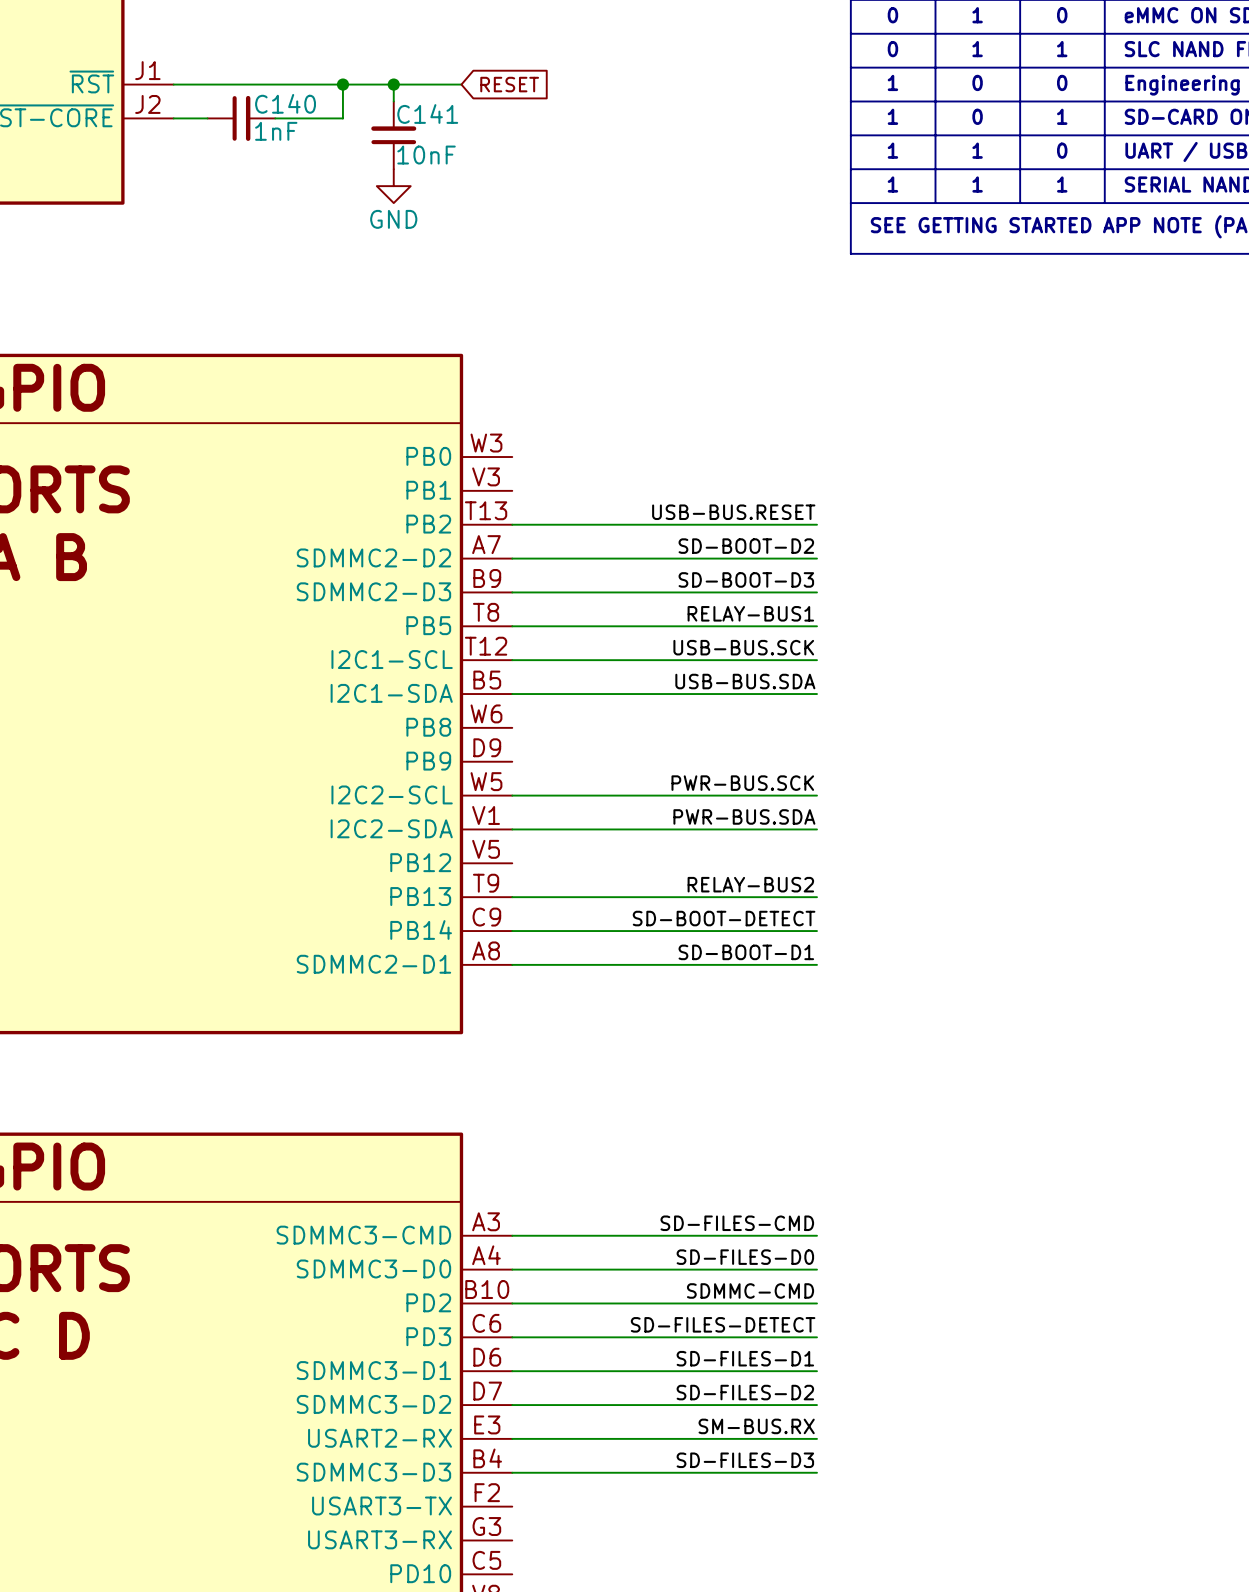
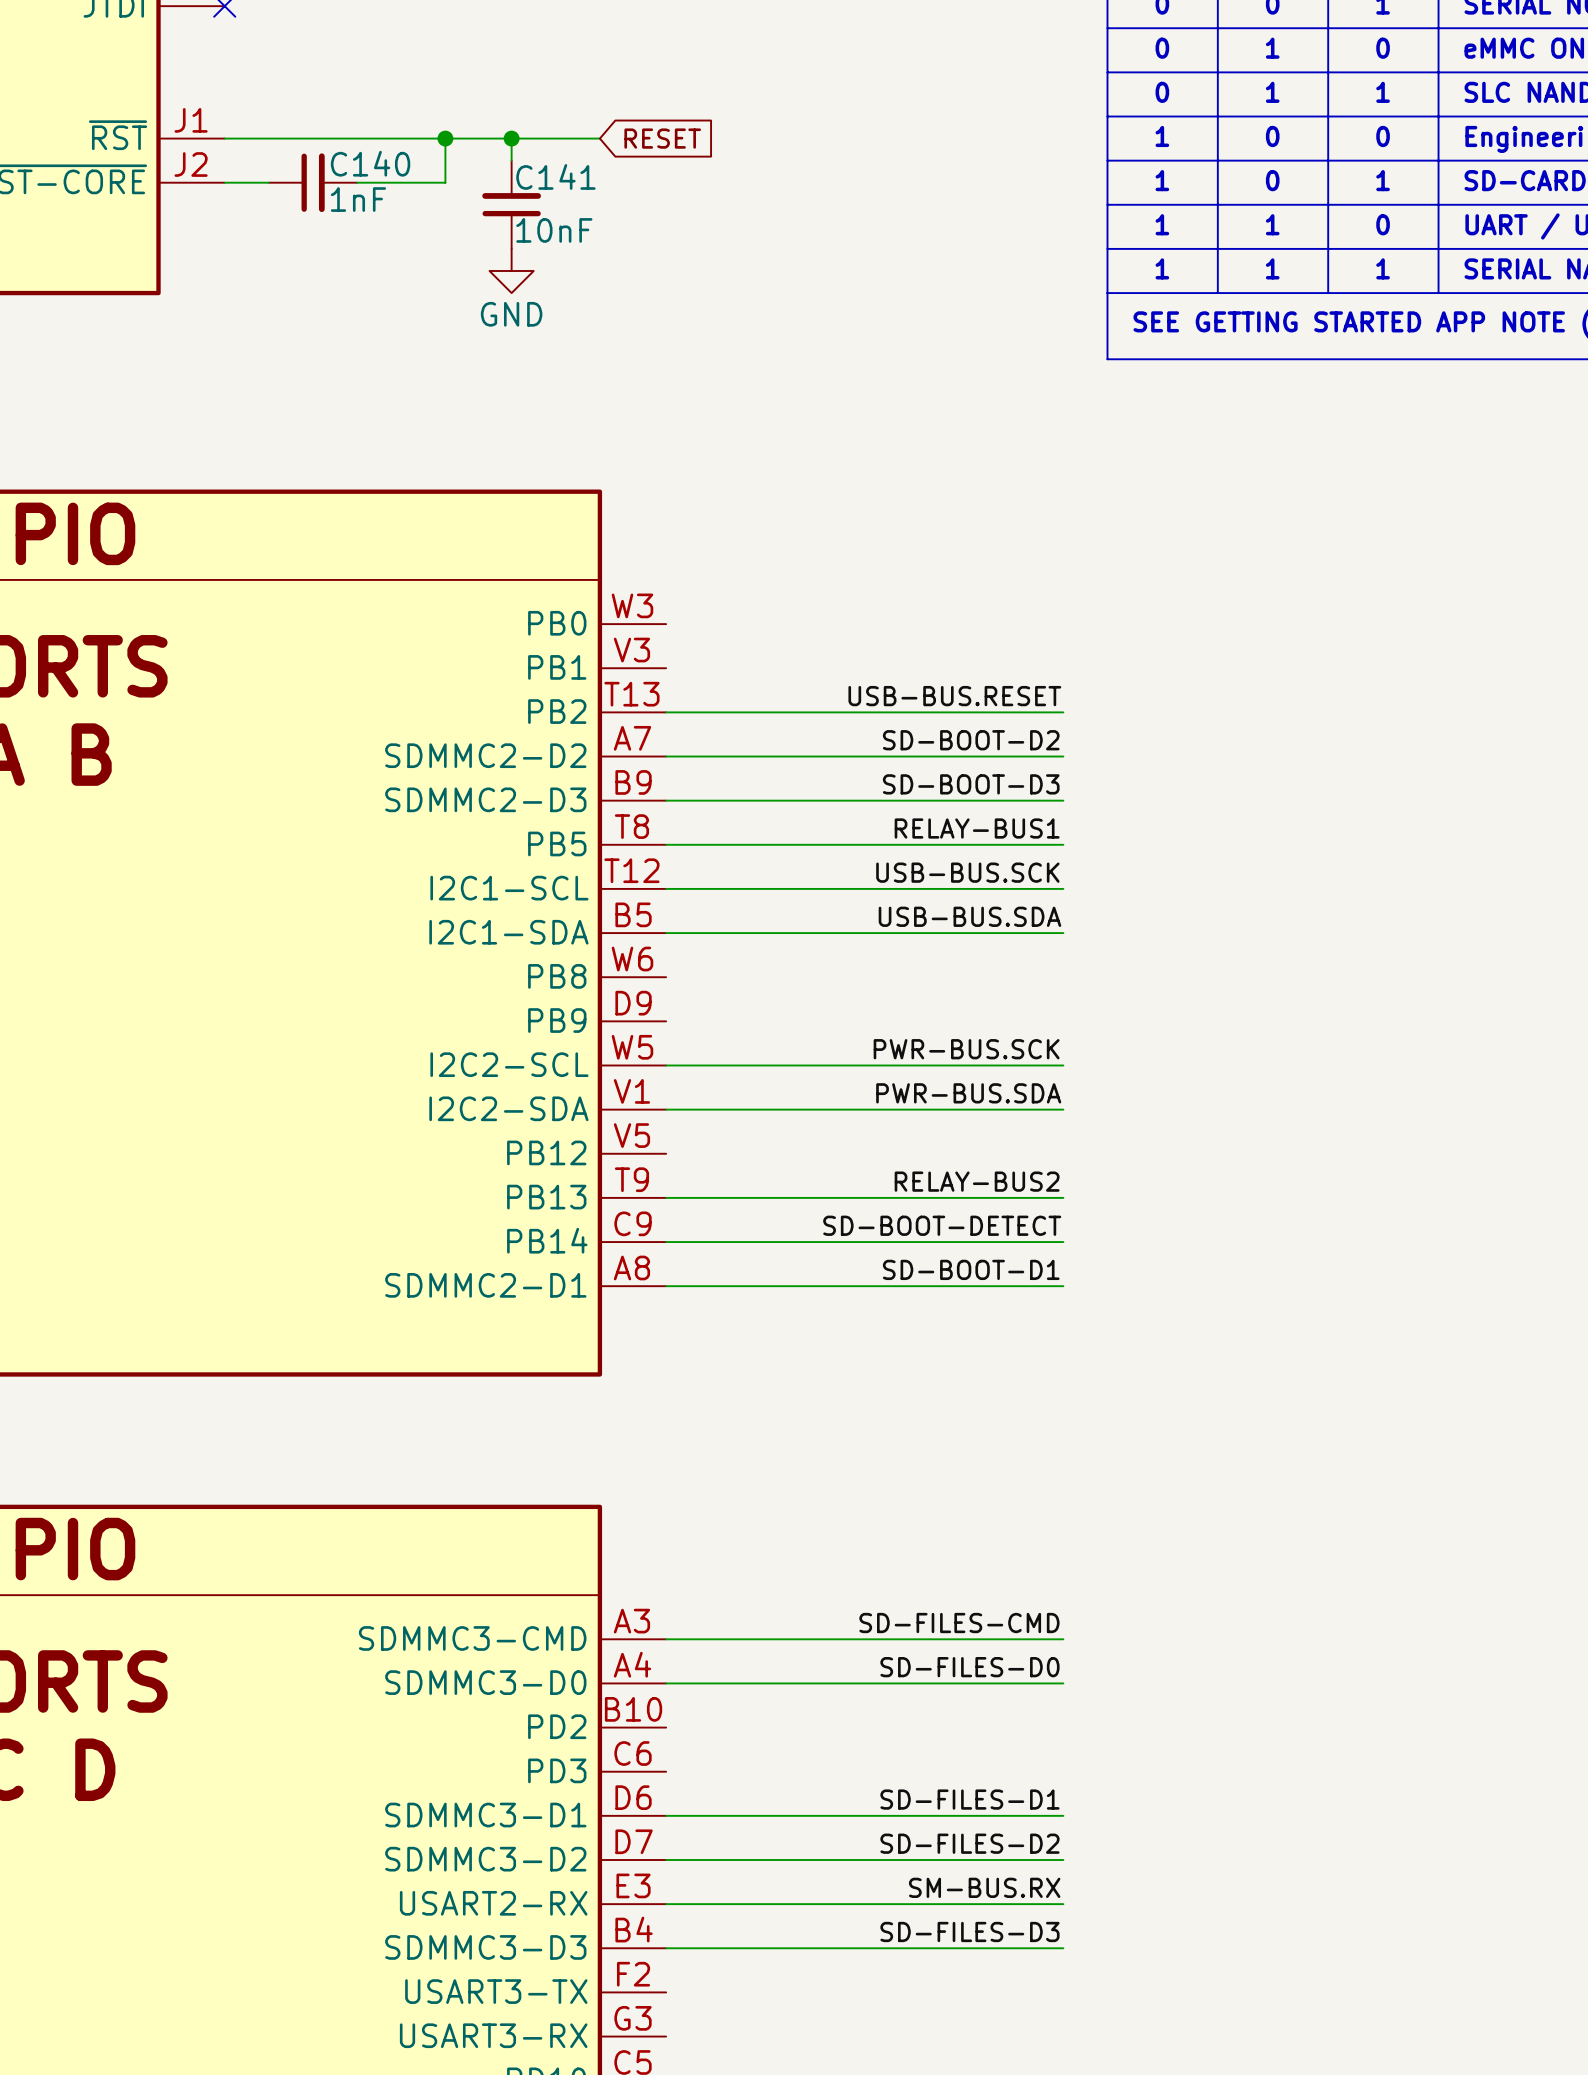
label: SDMMC-CMD (750, 1290) -> none
wire: (512, 1303) (816, 1303) -> none
label: SD-FILES-DETECT (723, 1324) -> none
wire: (512, 1337) (816, 1337) -> none

